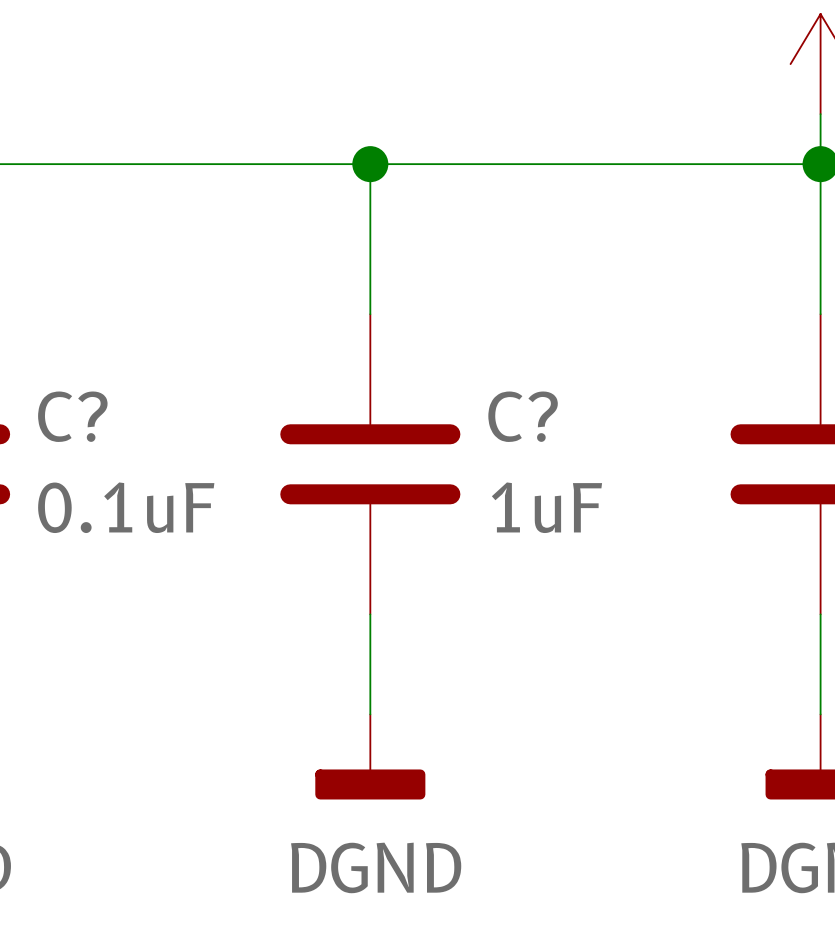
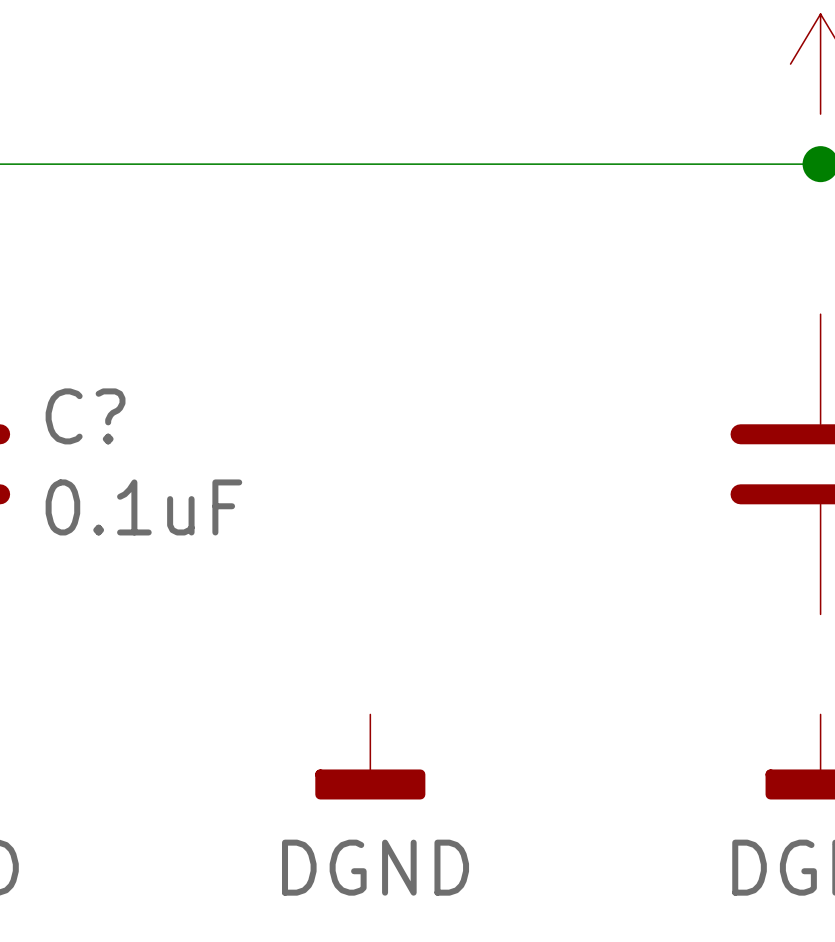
wire: (820, 114) (820, 314) -> none
wire: (370, 164) (370, 314) -> none
junction: (370, 164) -> none
C?: 1uF (370, 464) -> none
wire: (370, 614) (370, 714) -> none
wire: (820, 614) (820, 714) -> none

